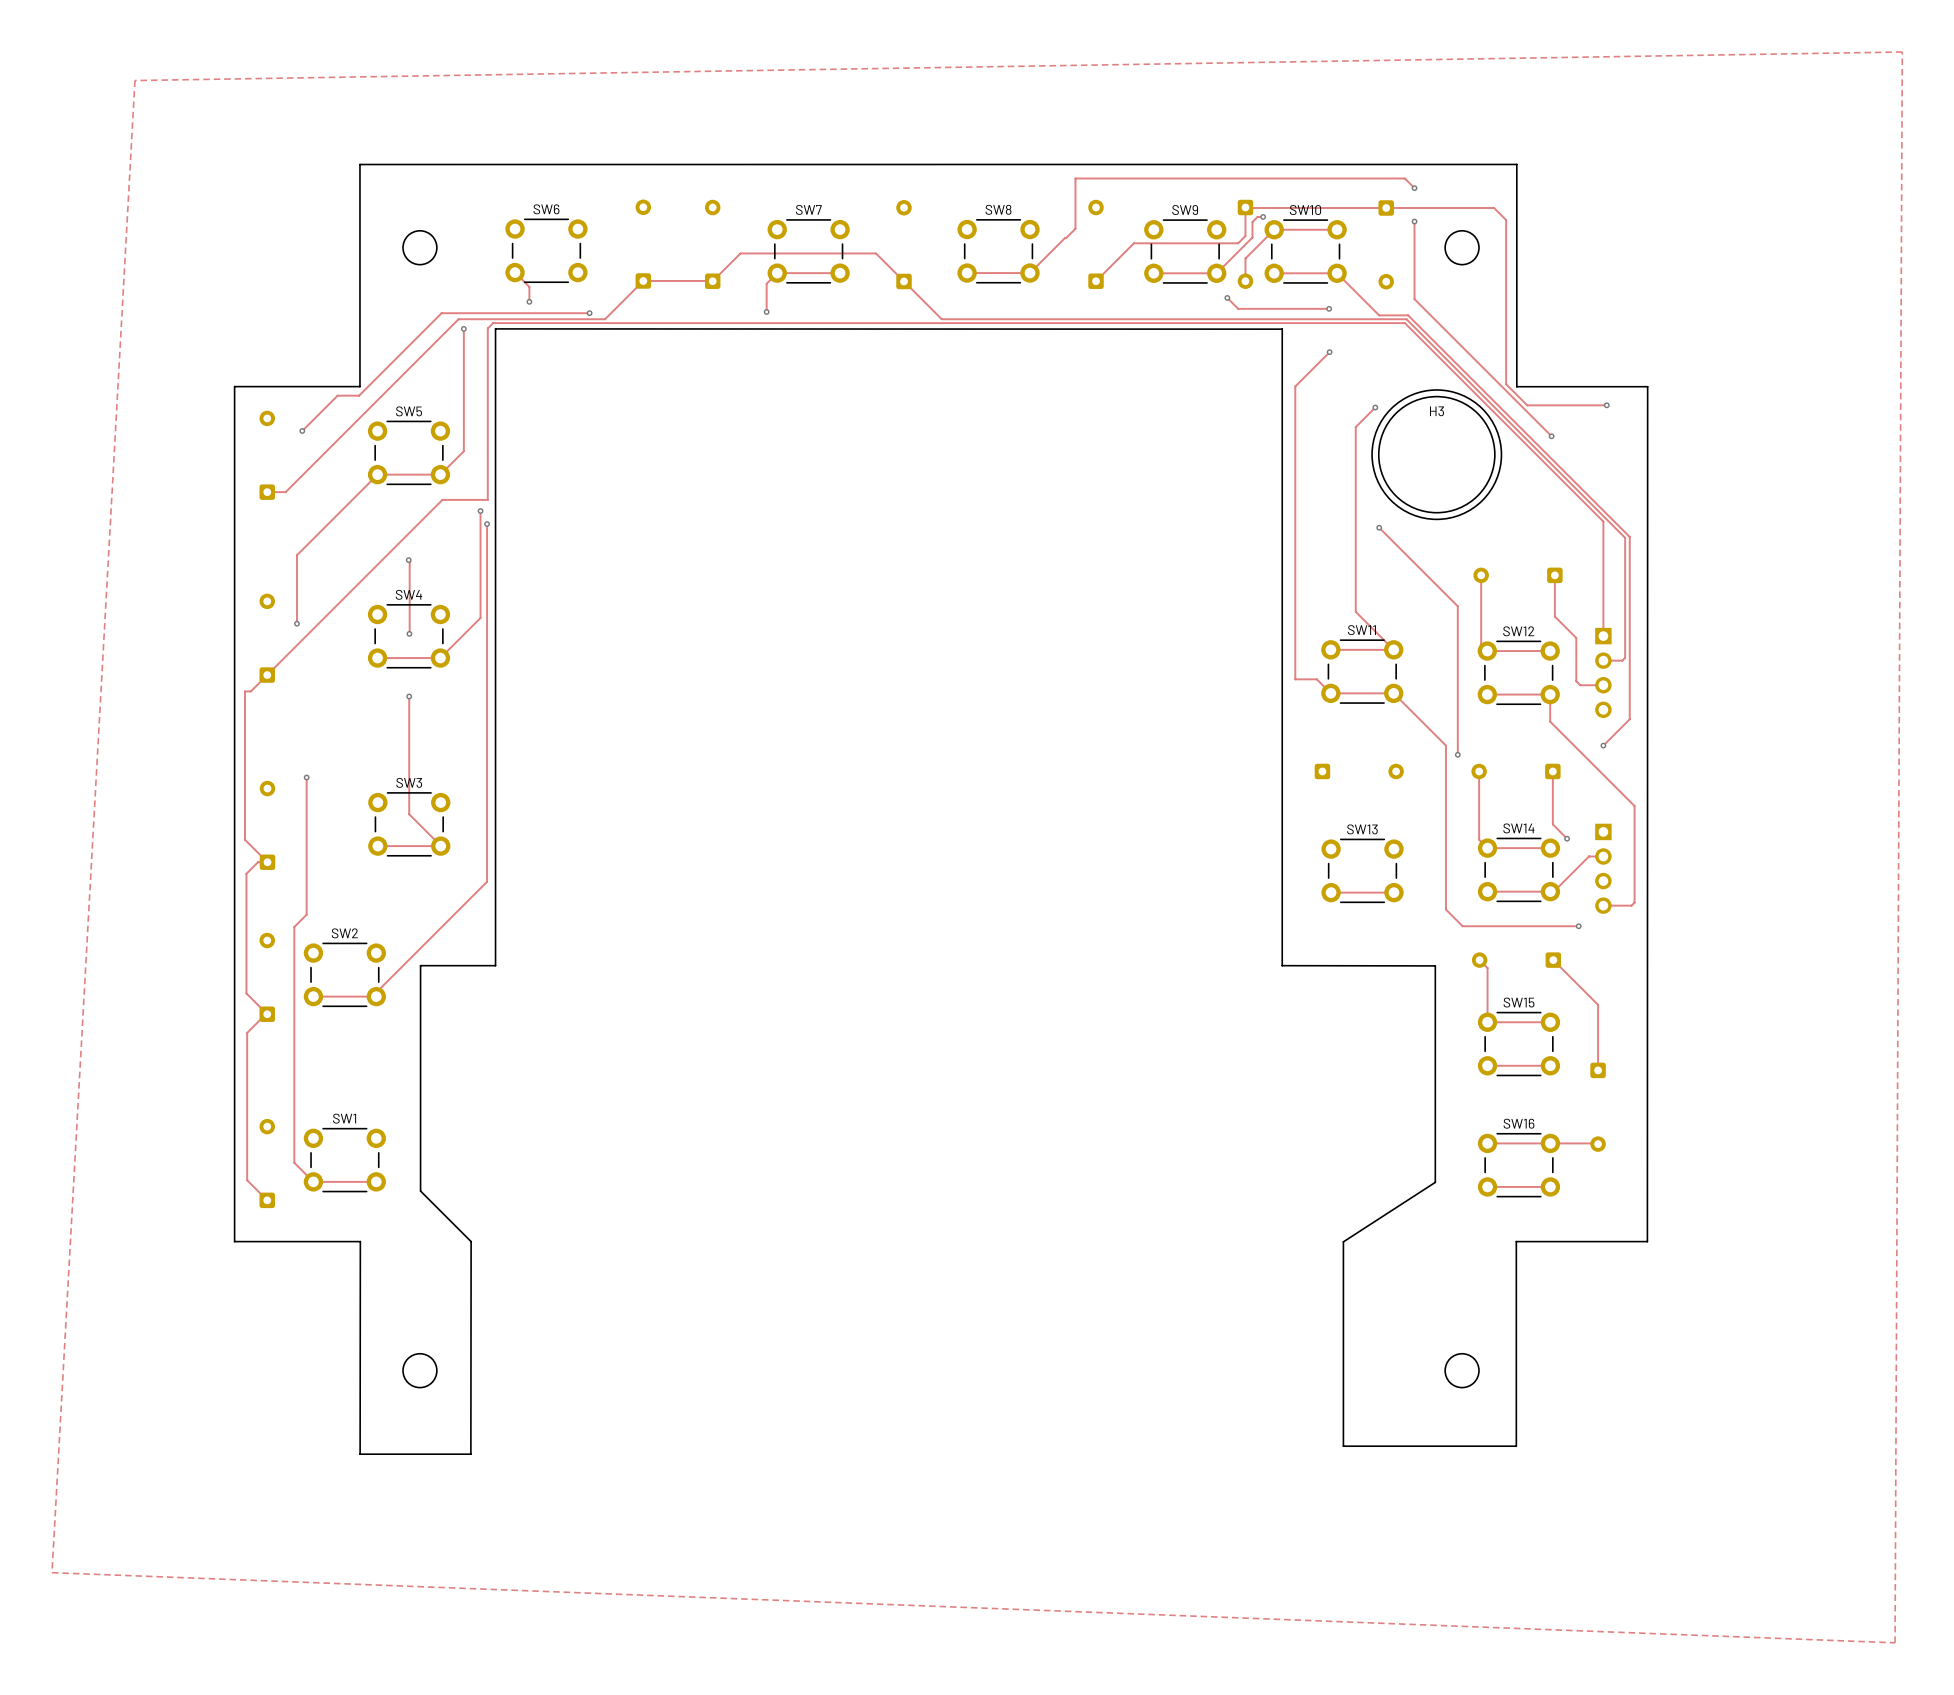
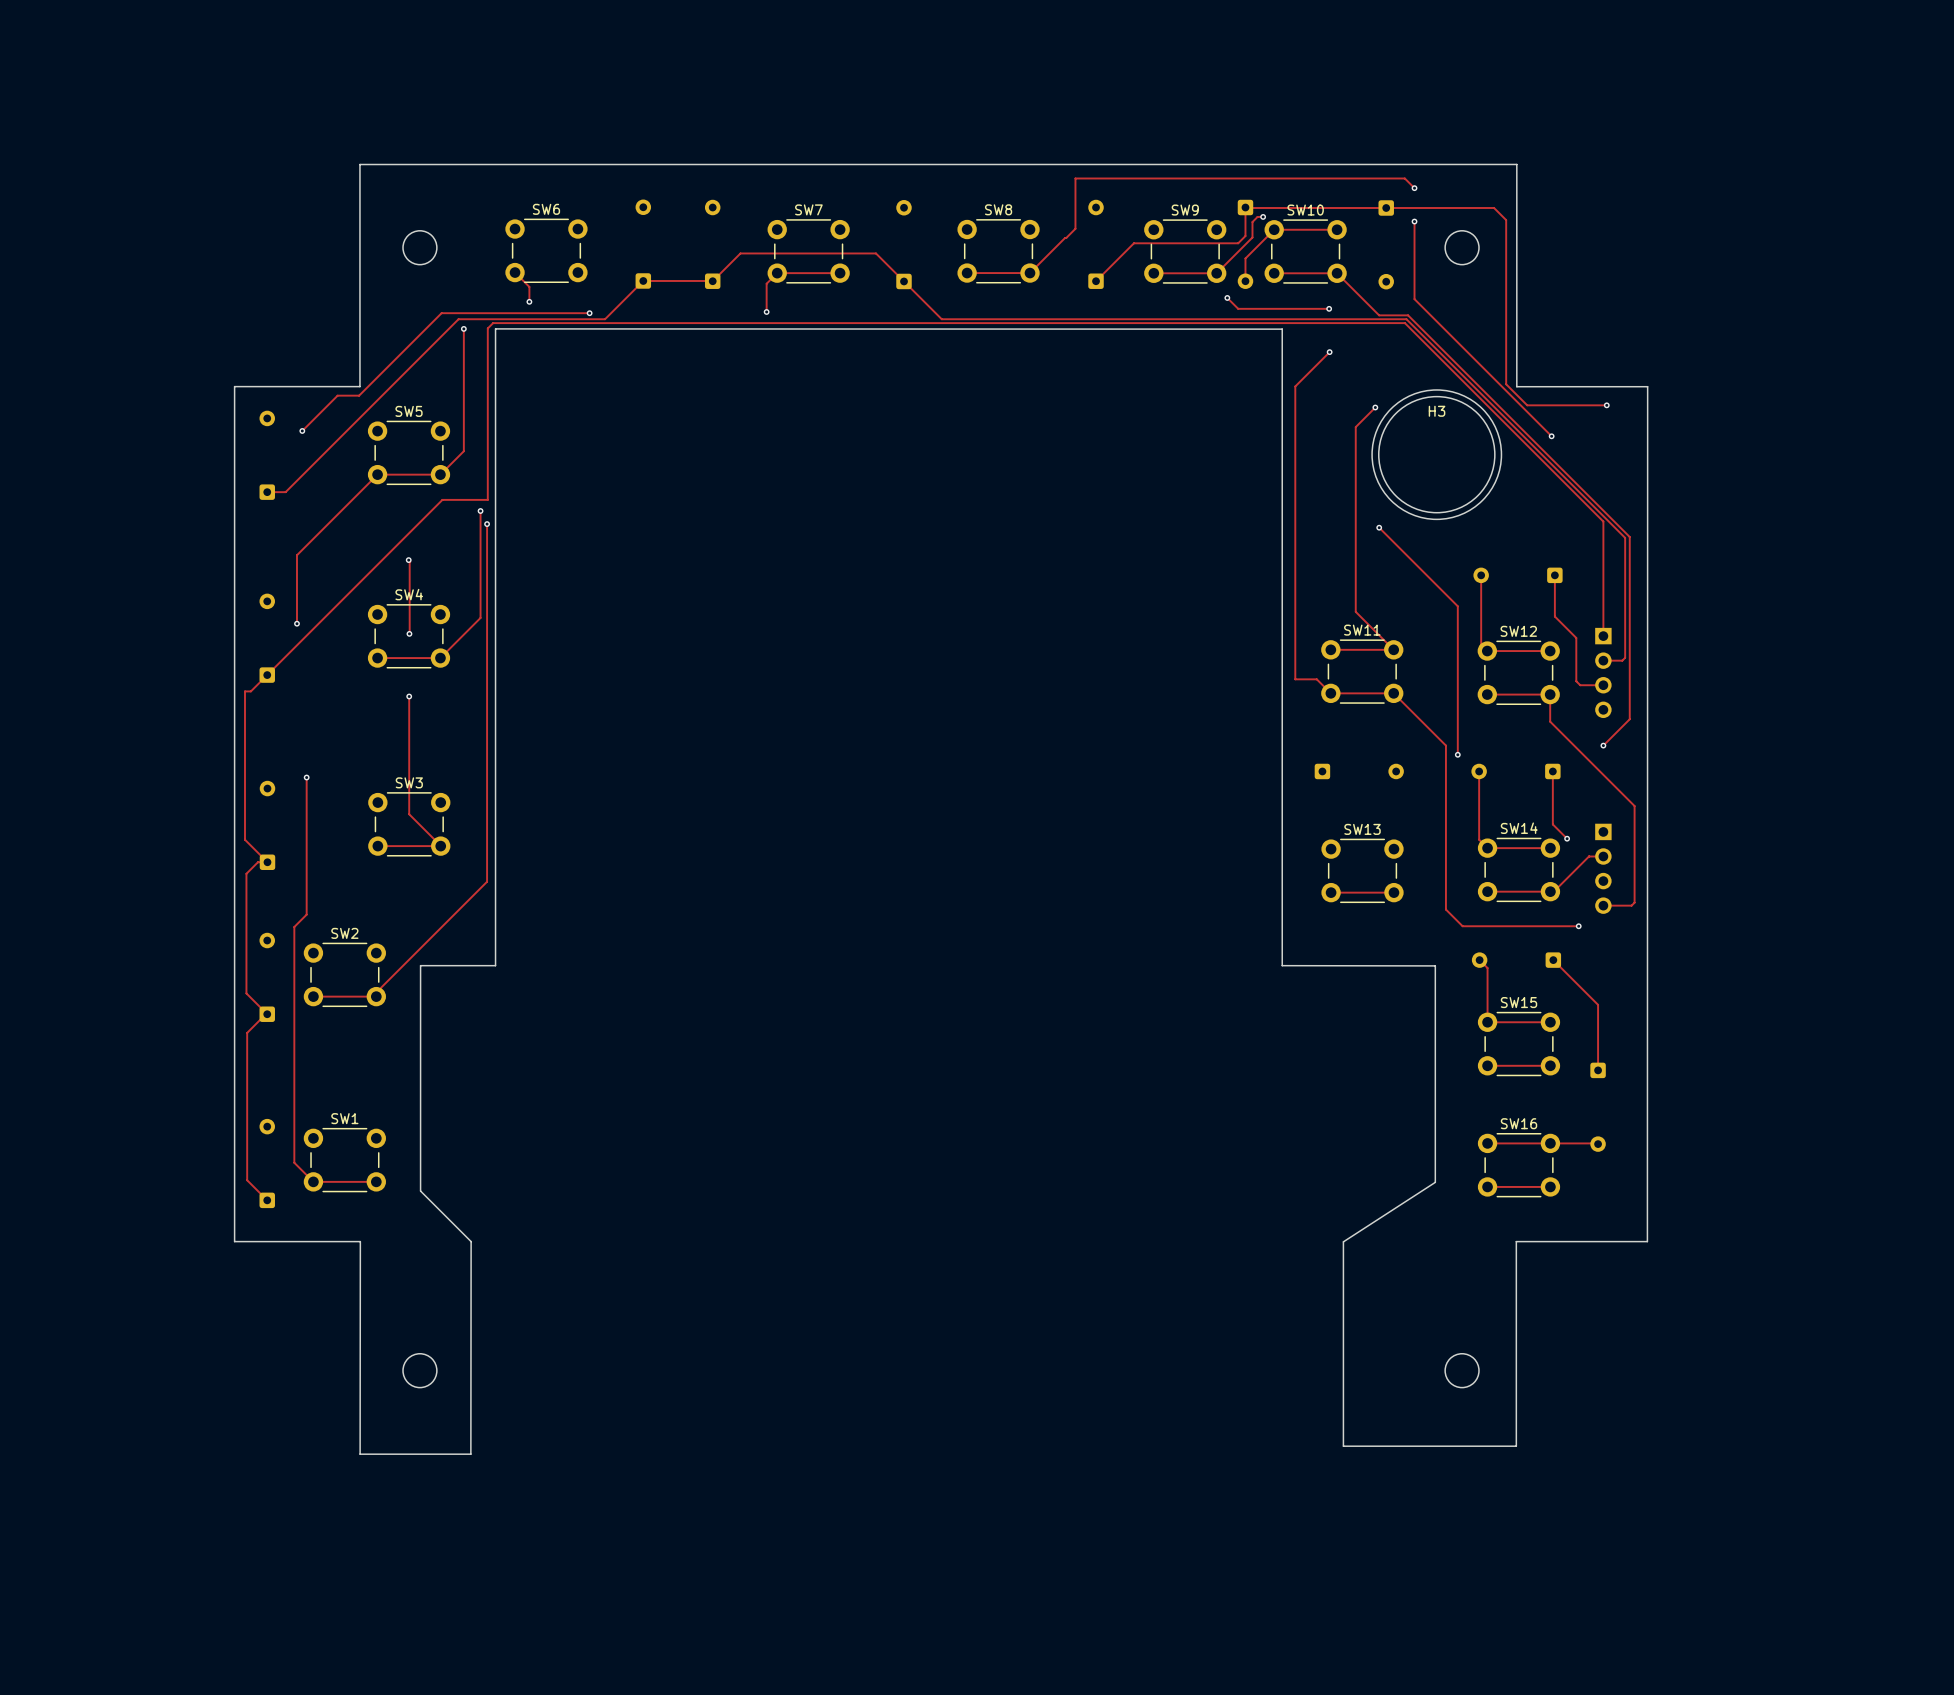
zone outline: (1902, 52) (1895, 1642) (52, 1572) (134, 80) (1902, 52) -> none

